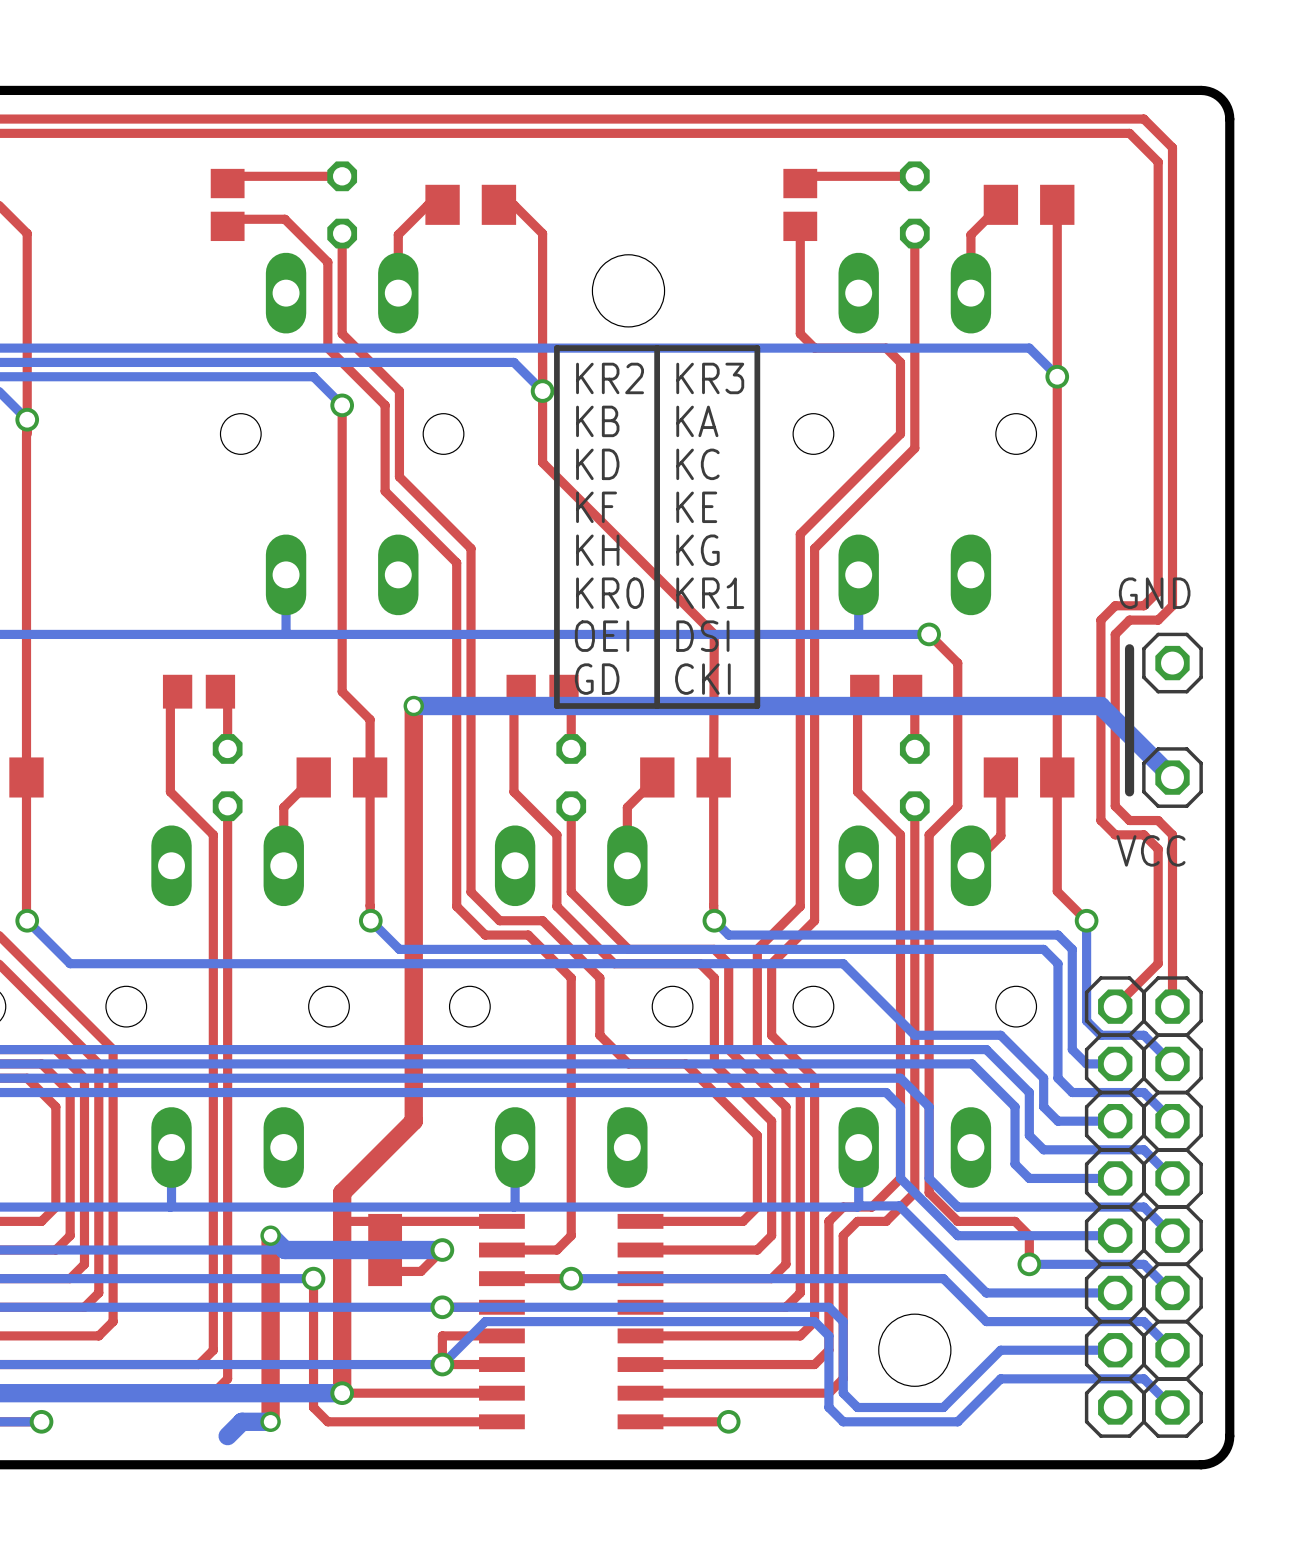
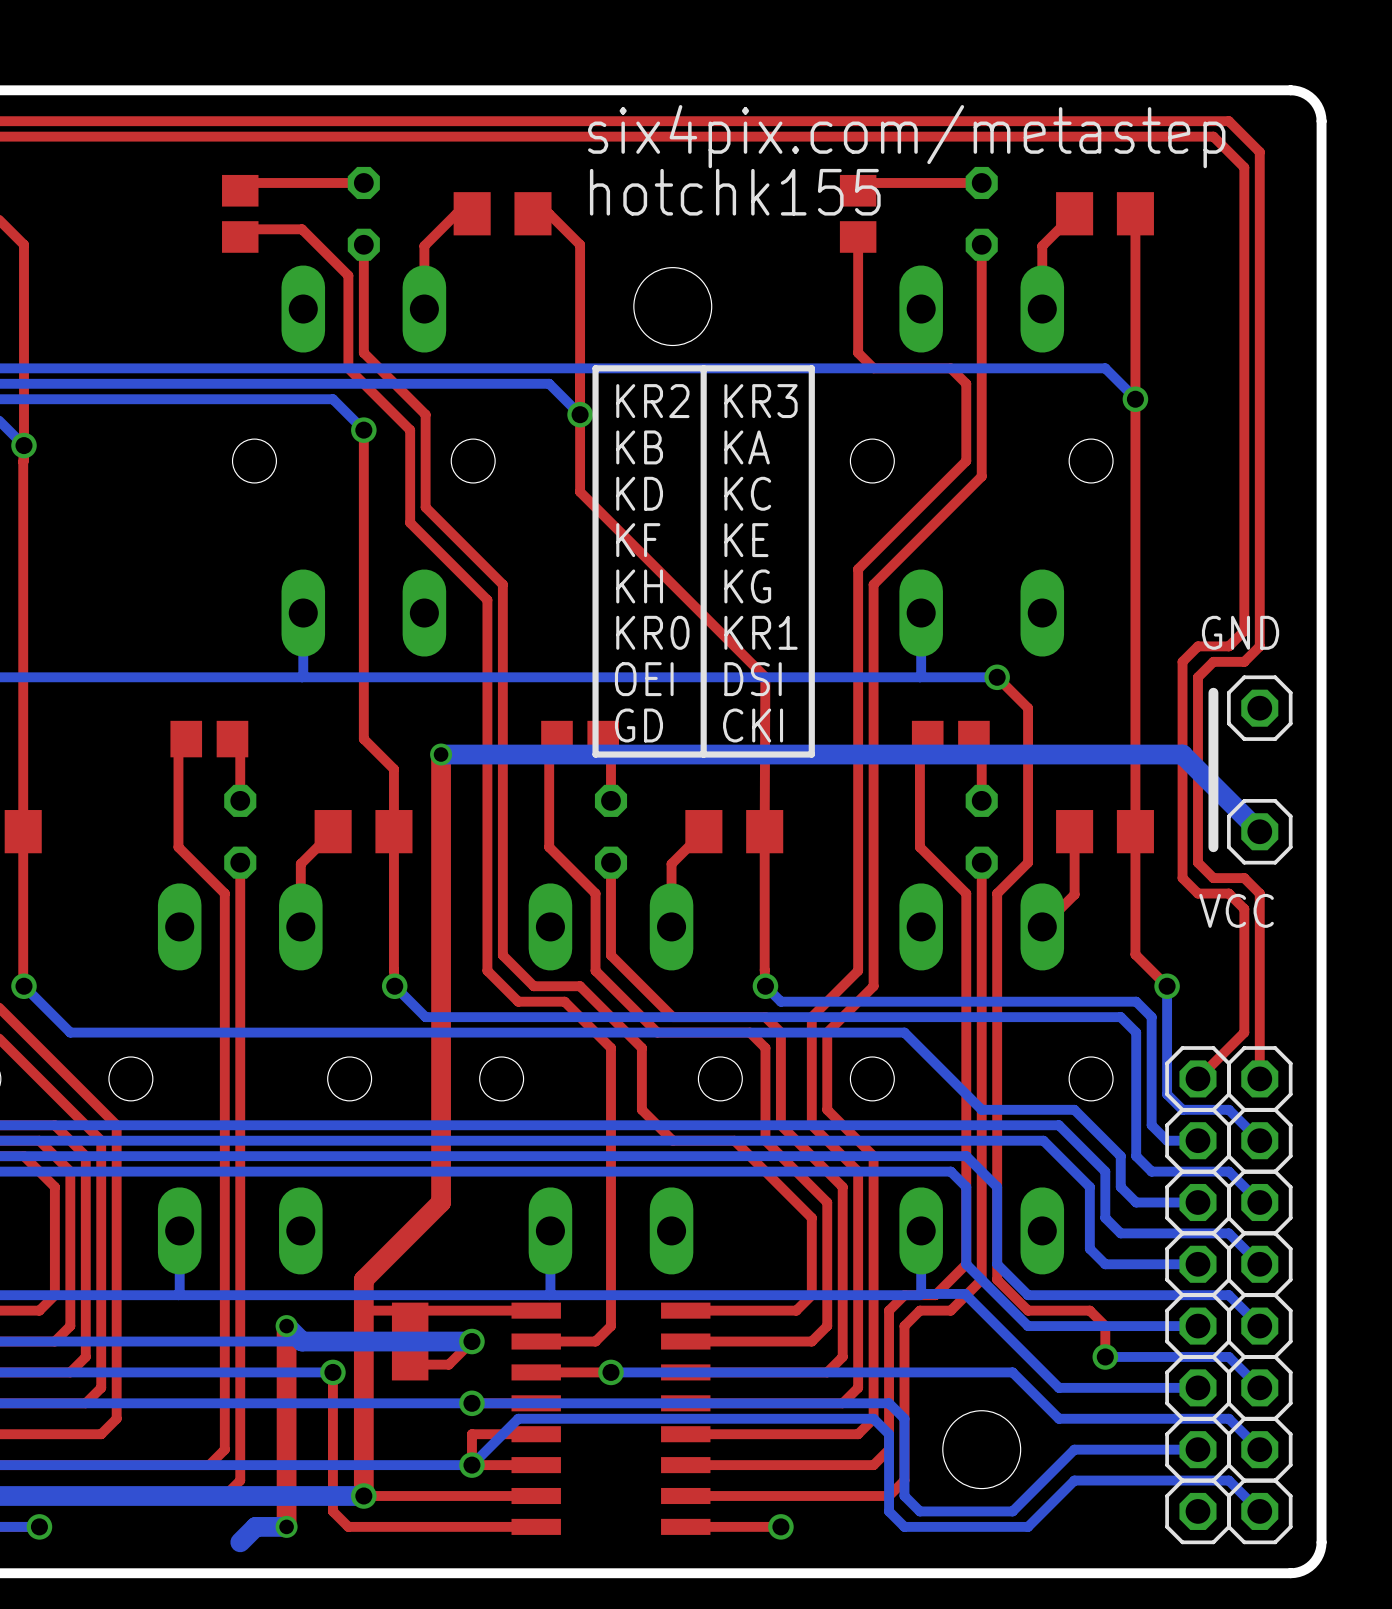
text: none -> six4pix.com/metastep (906, 136)
text: none -> hotchk155 (735, 192)

